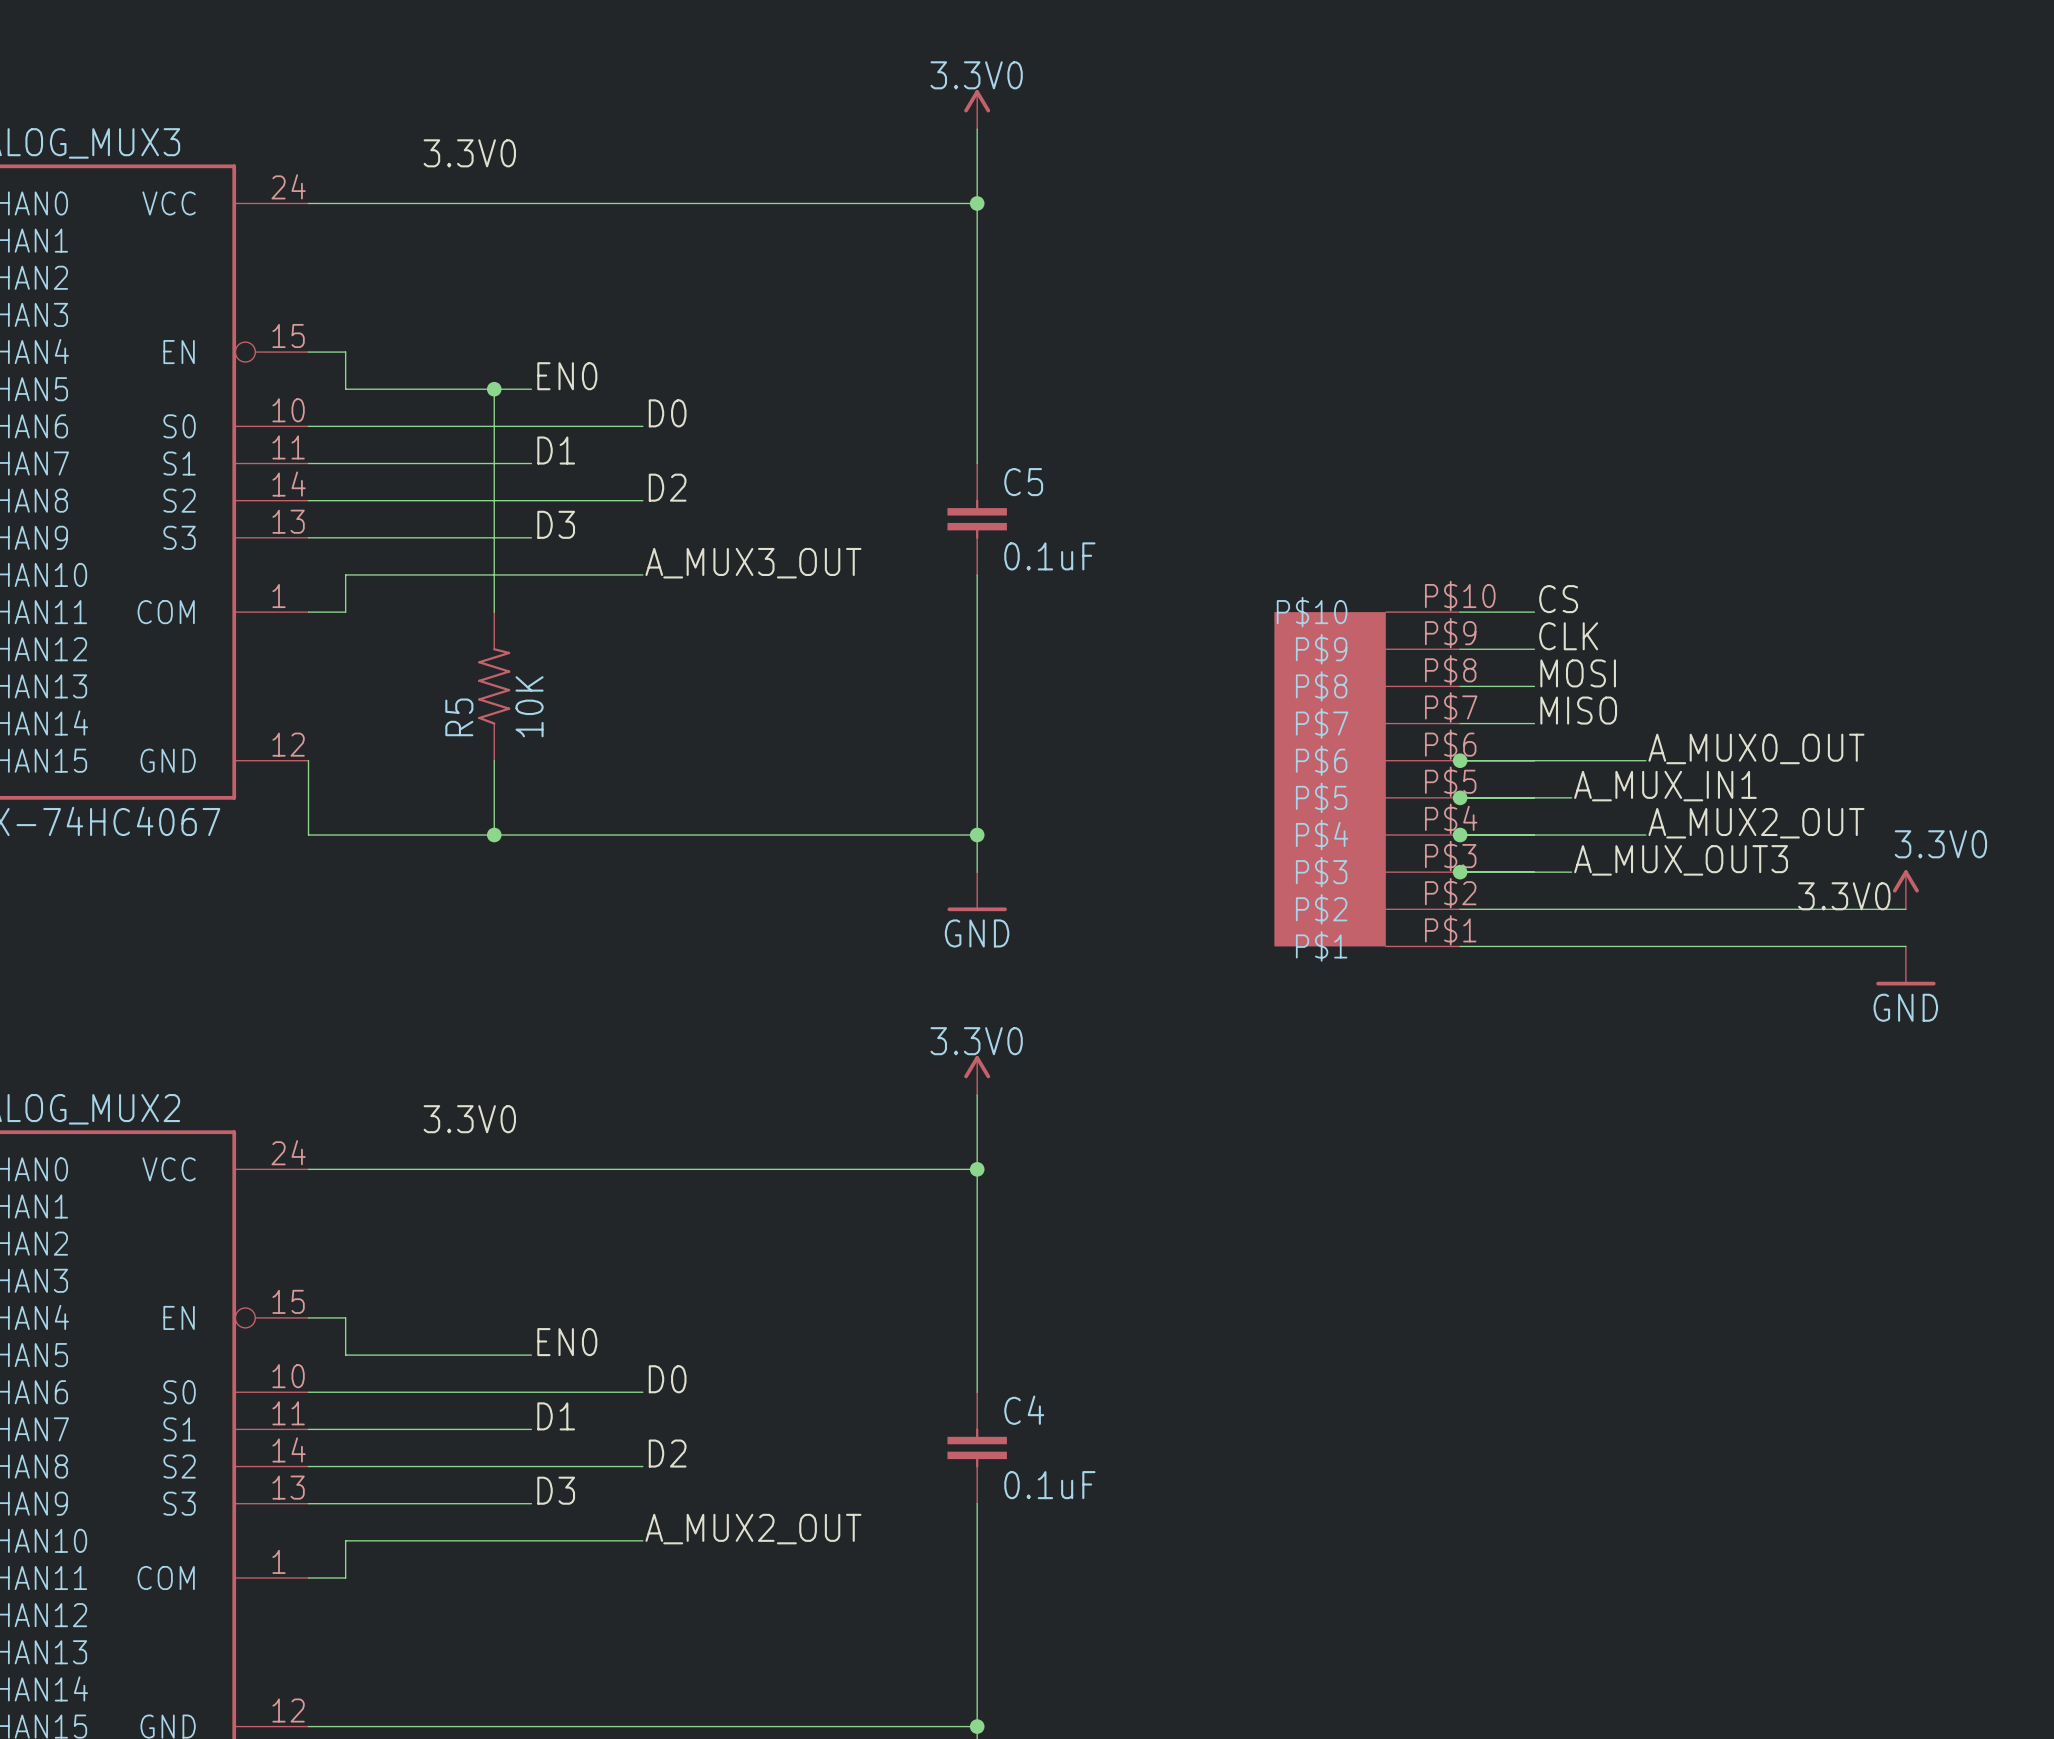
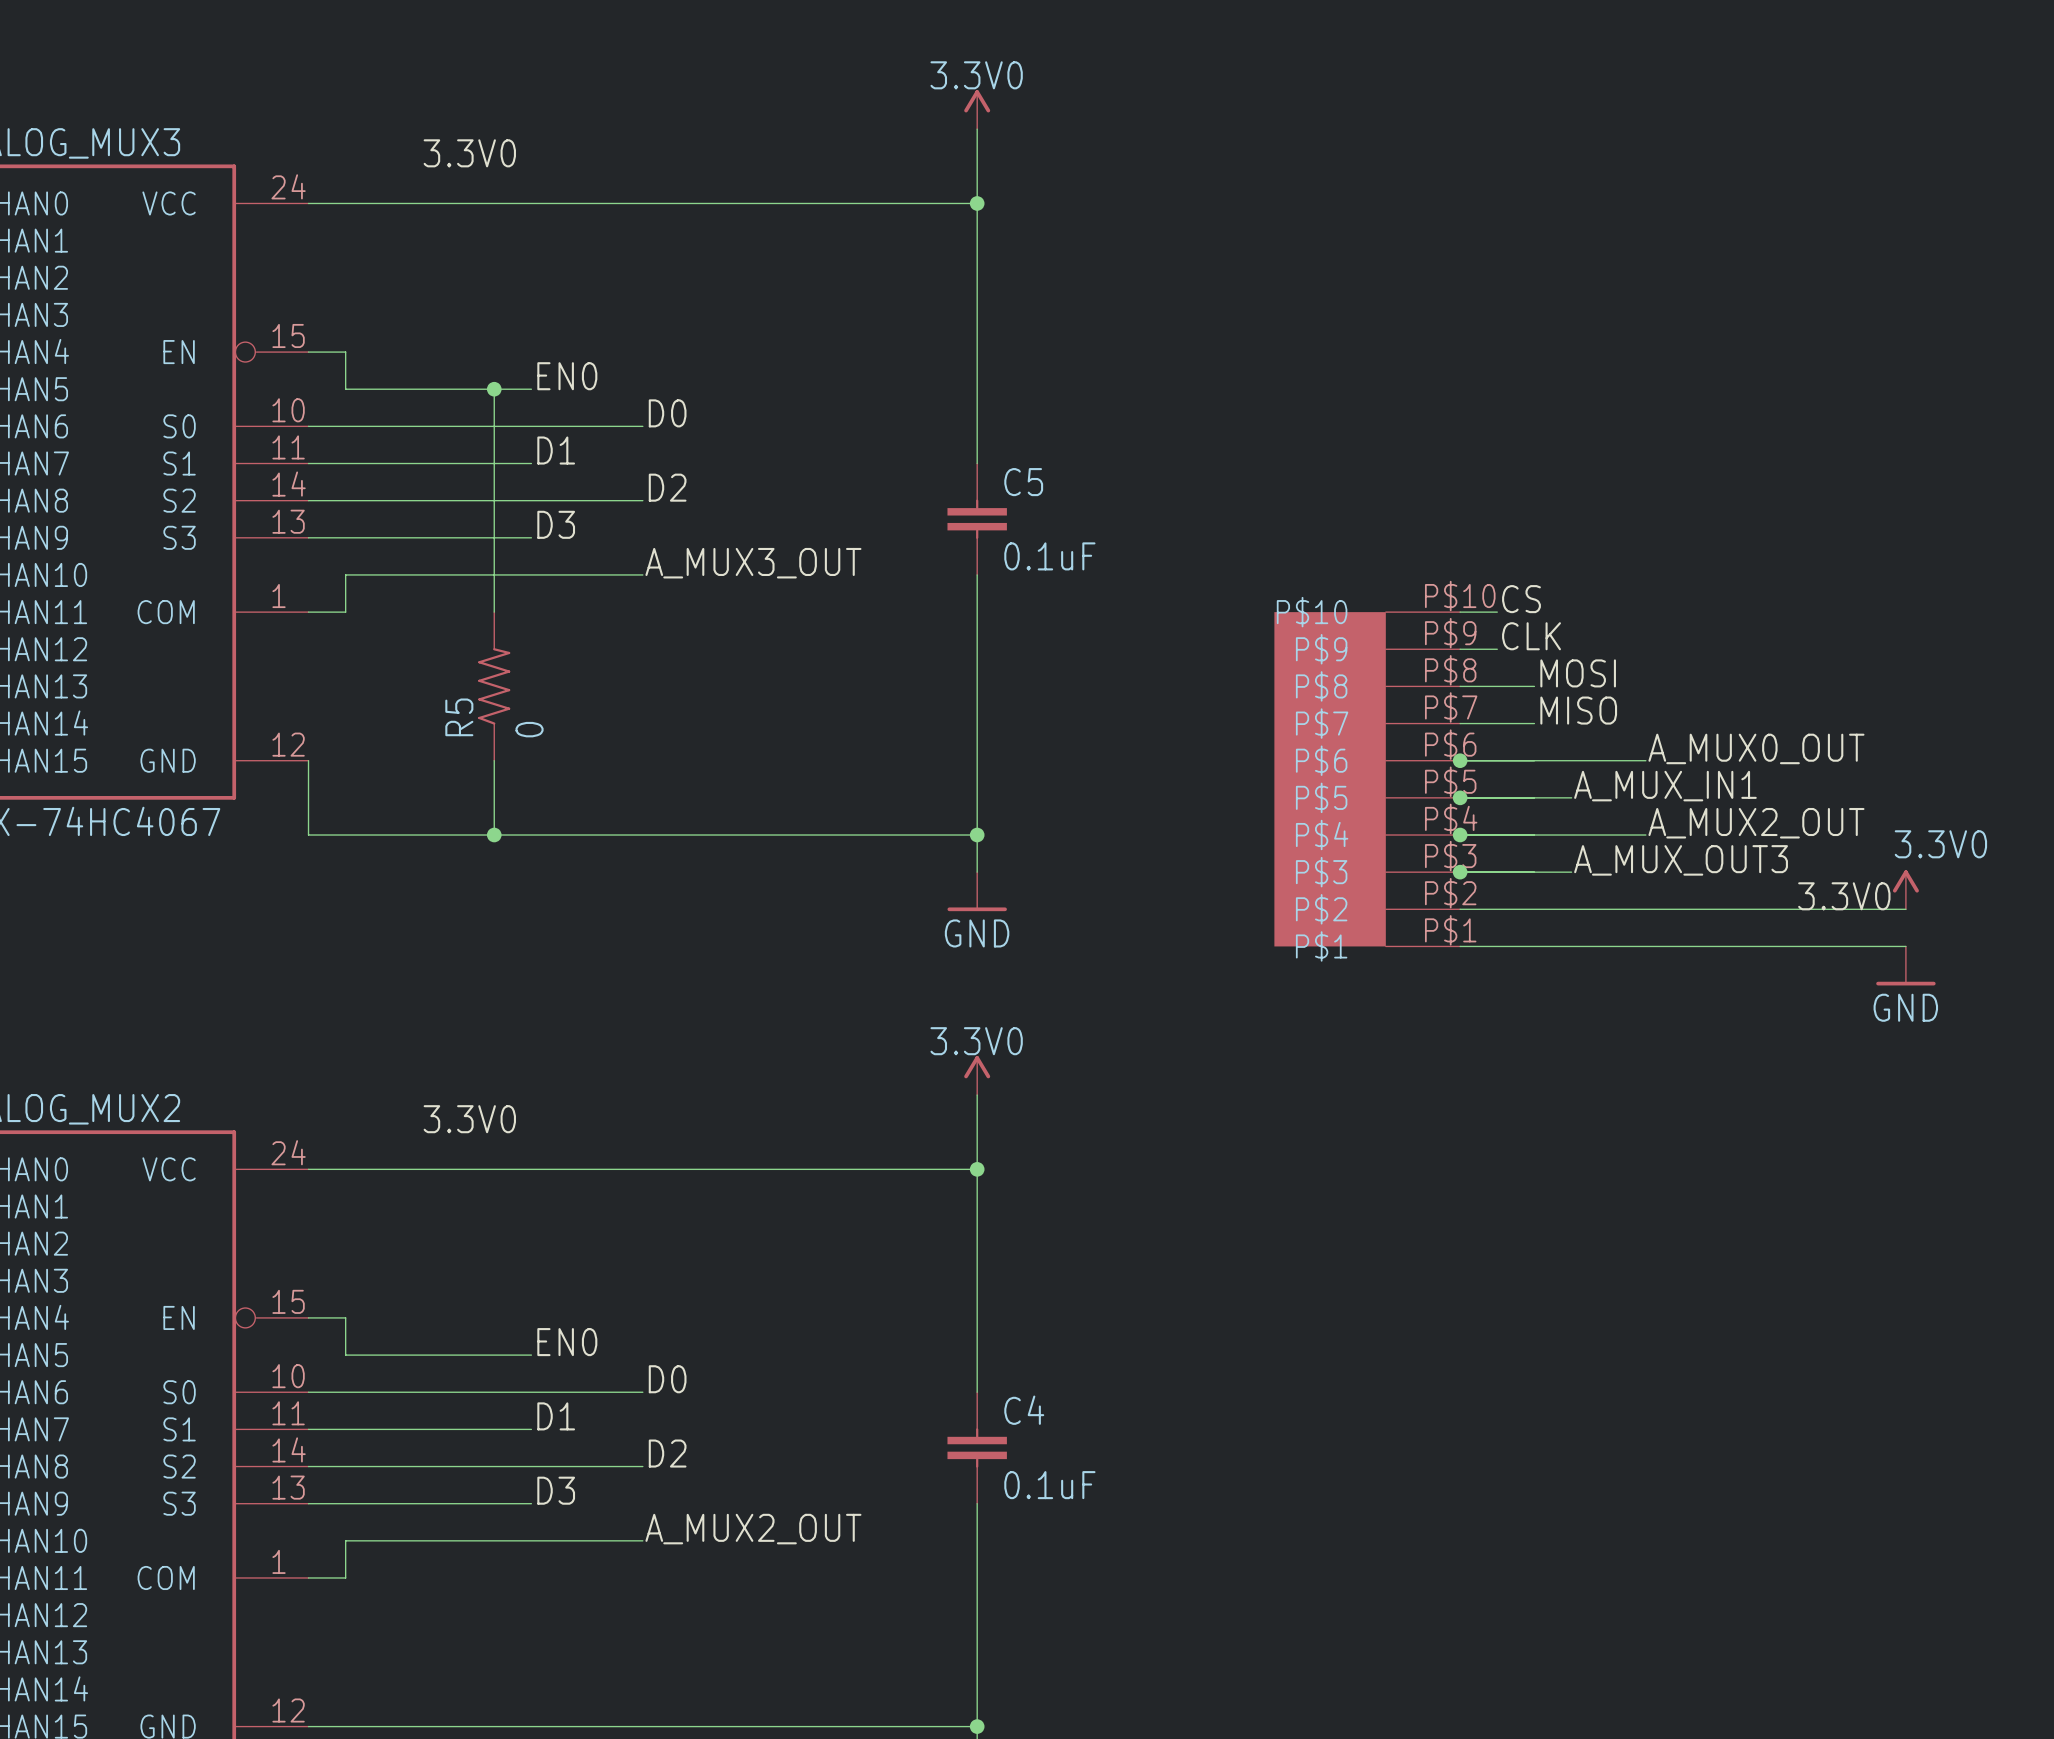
label position: CS (1558, 599) -> CS (1521, 599)
wire: (1497, 612) (1534, 612) -> none
label position: CLK (1568, 636) -> CLK (1531, 636)
wire: (1497, 649) (1534, 649) -> none
R5 value: 10K (529, 706) -> 0 (529, 729)

